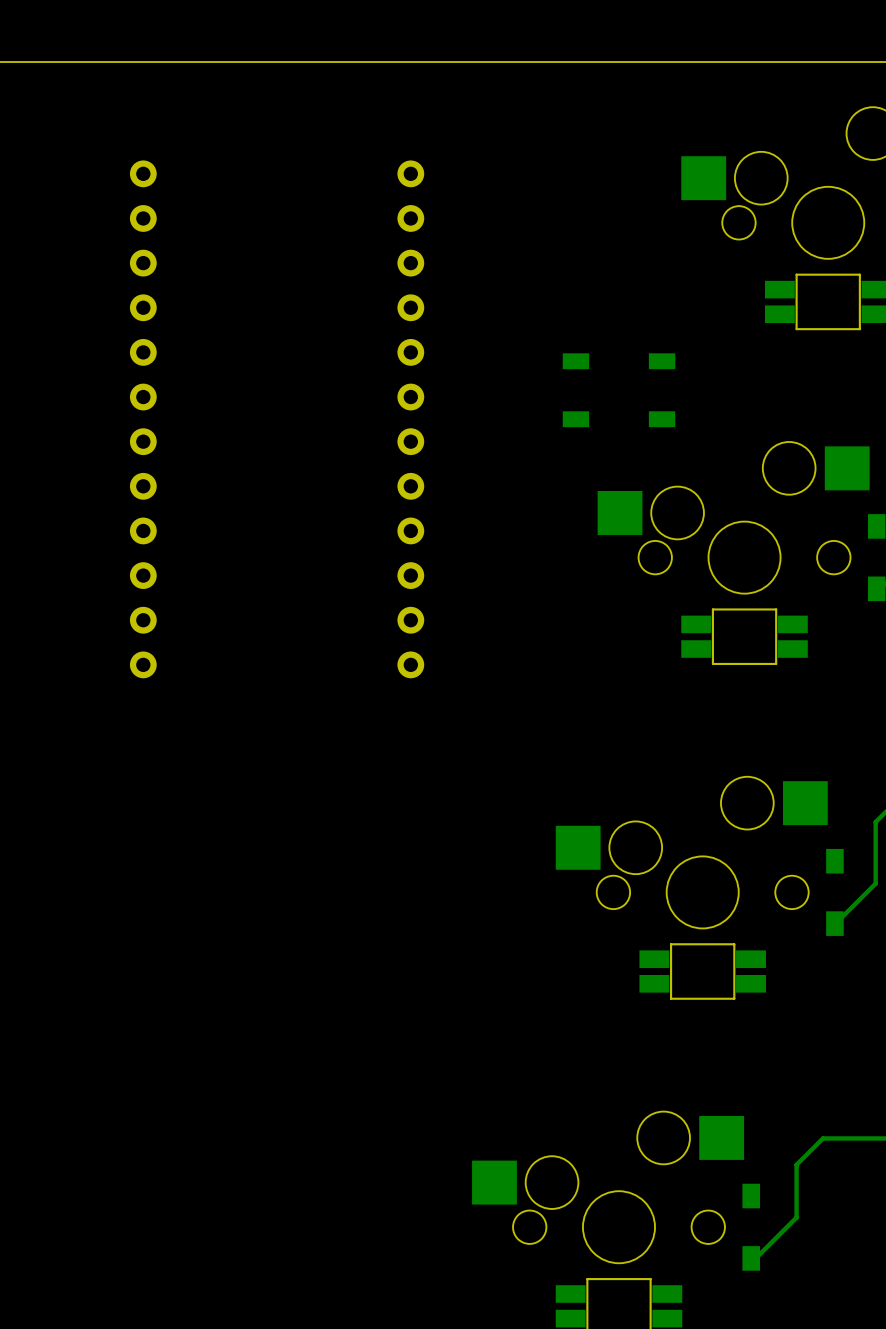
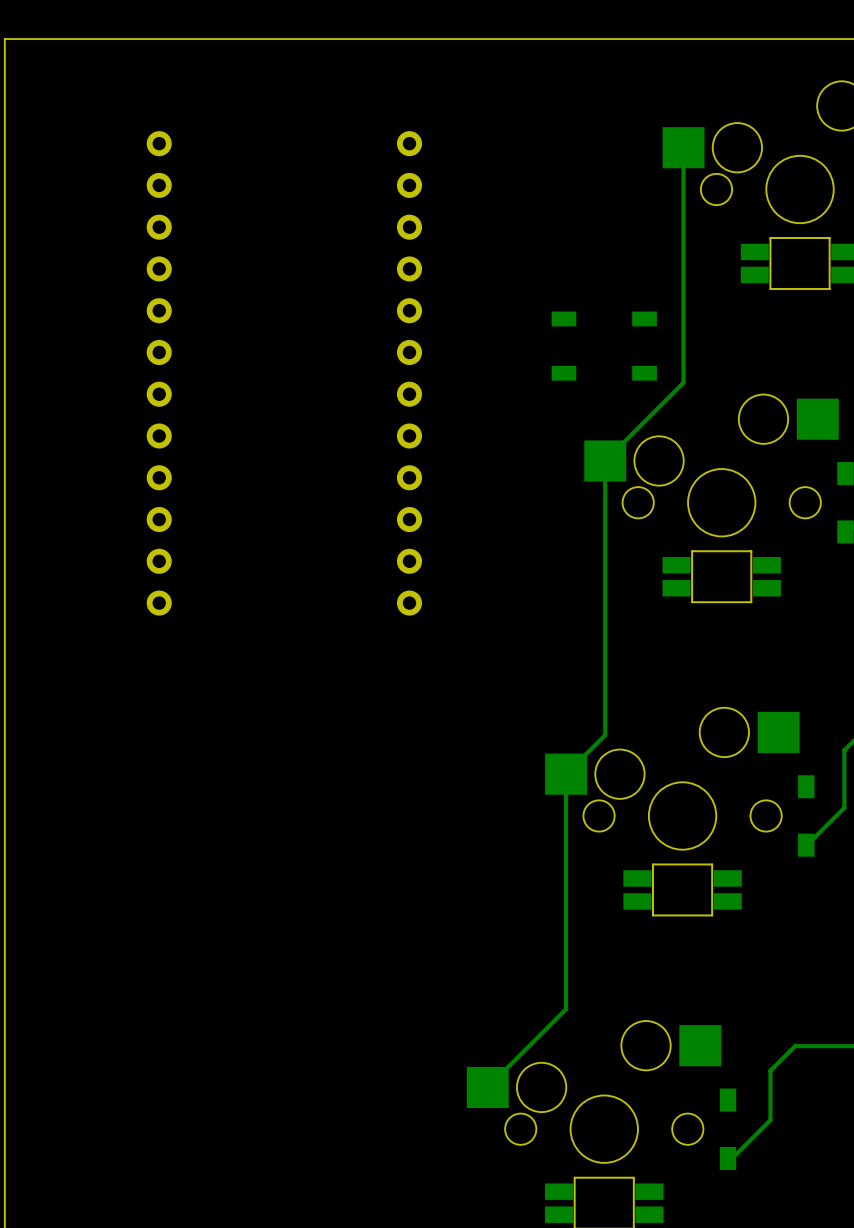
bottom track: none -> (683, 147) (683, 382) (605, 460) (605, 735) (566, 774) (566, 1009) (487, 1087)

